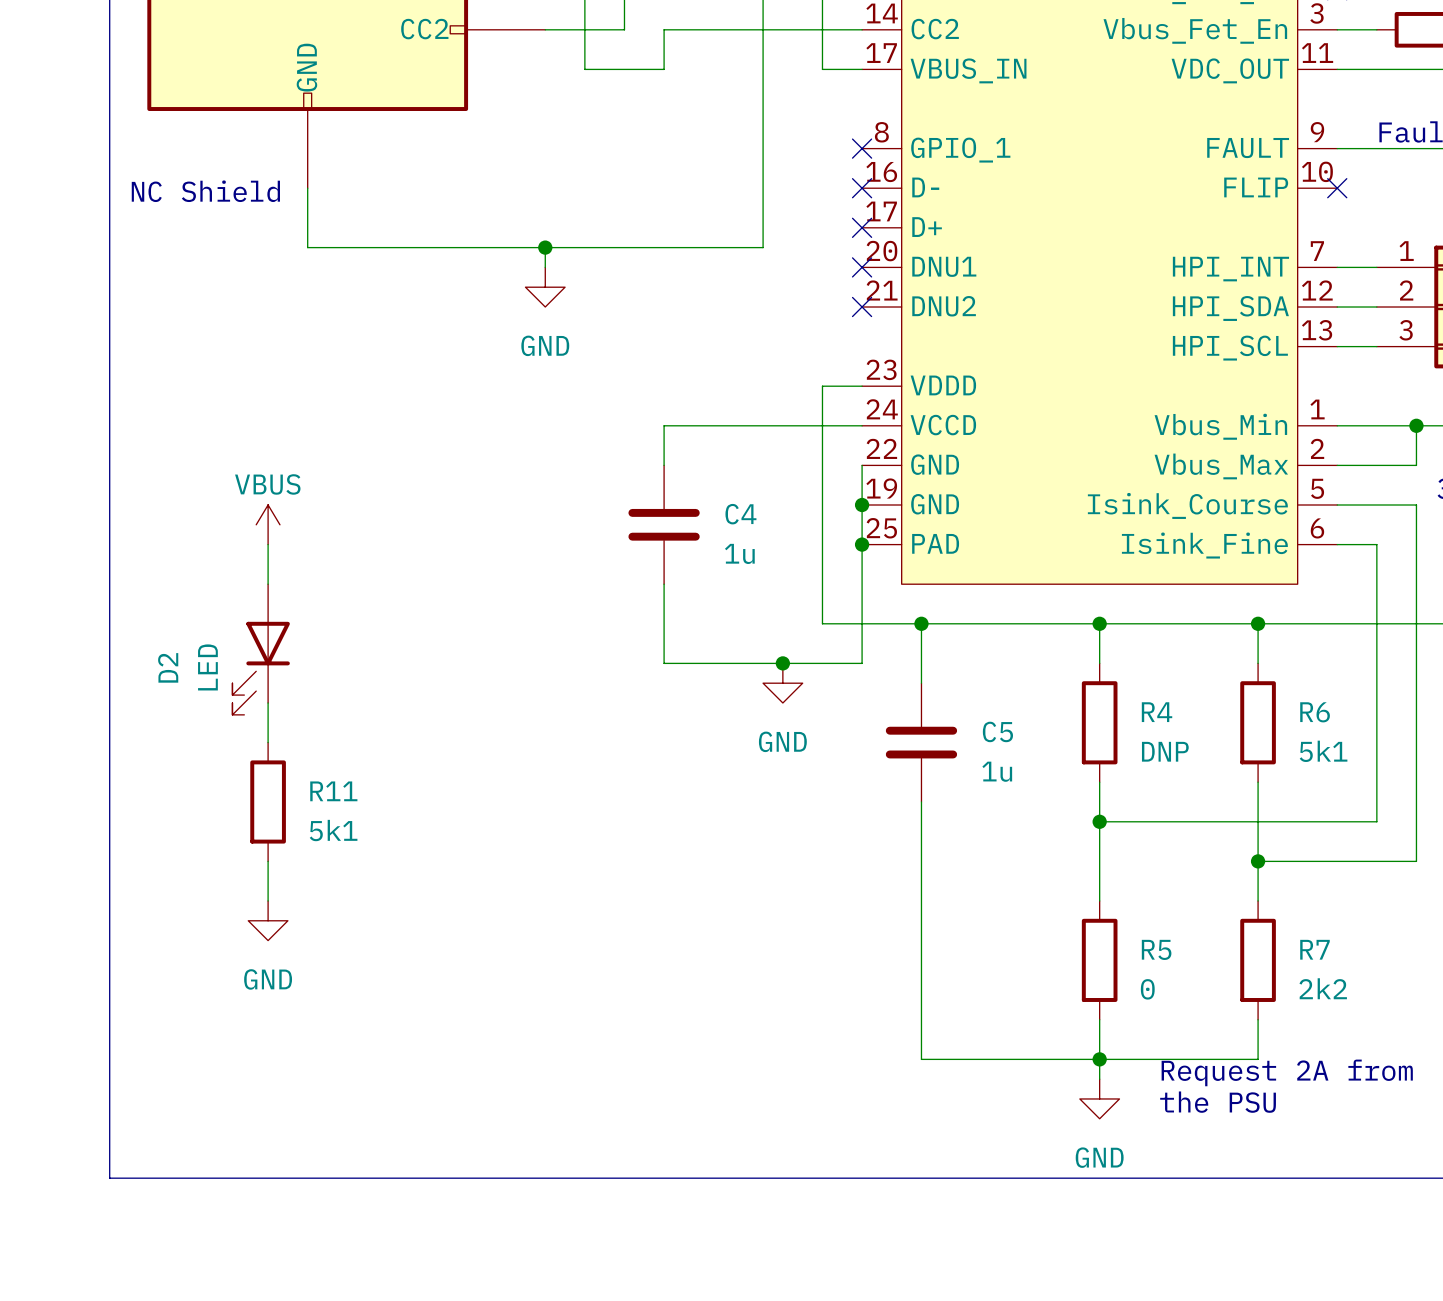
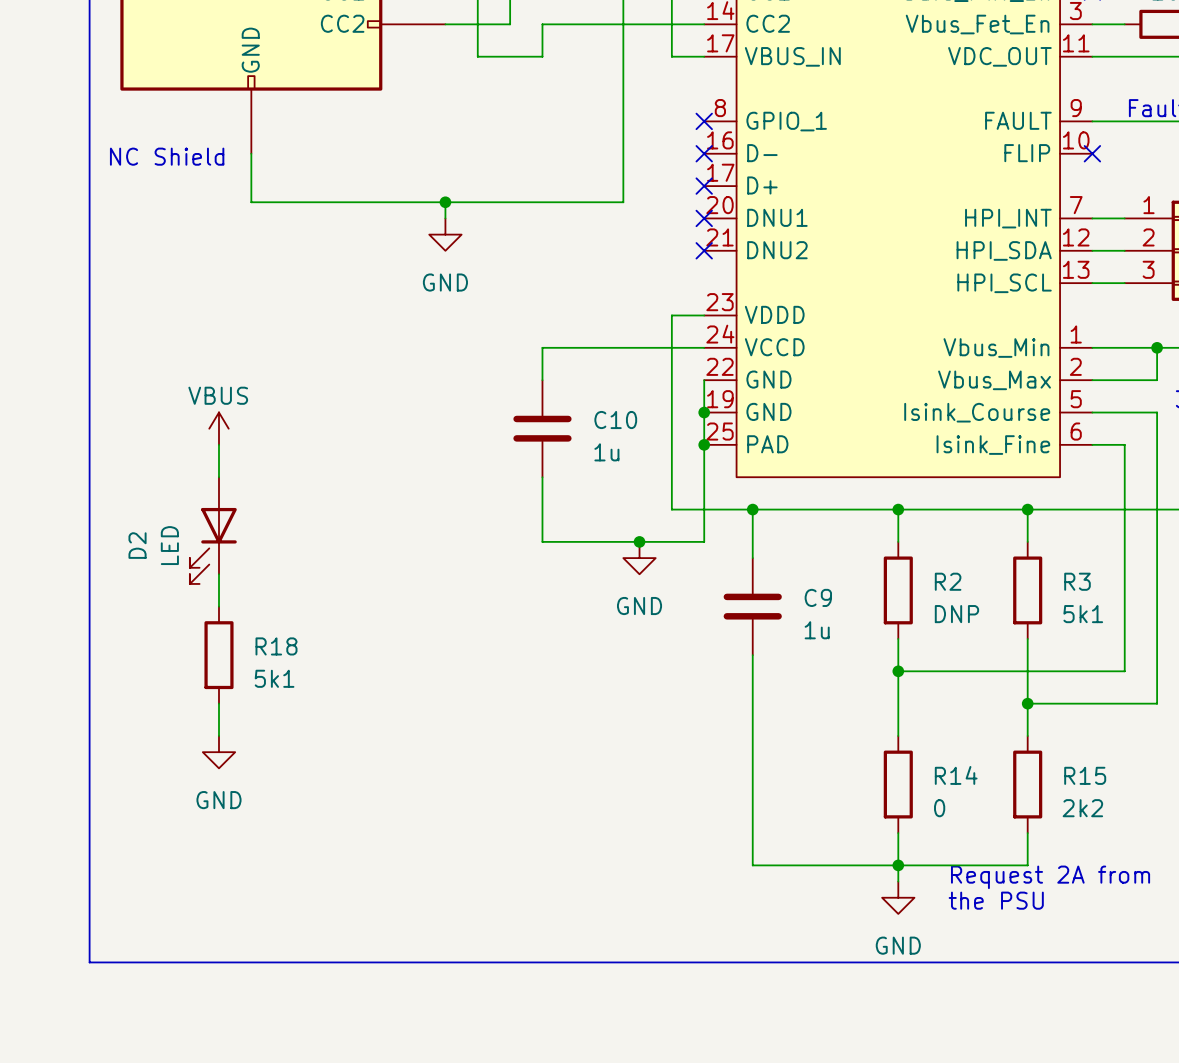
C4 name: C4 (740, 514) -> C10 (615, 420)
R4 name: R4 (1157, 712) -> R2 (948, 581)
R6 name: R6 (1315, 712) -> R3 (1077, 581)
C5 name: C5 (997, 731) -> C9 (818, 597)
R11 name: R11 (333, 791) -> R18 (276, 646)
R5 name: R5 (1156, 949) -> R14 (956, 775)
R7 name: R7 (1314, 949) -> R15 (1085, 775)

